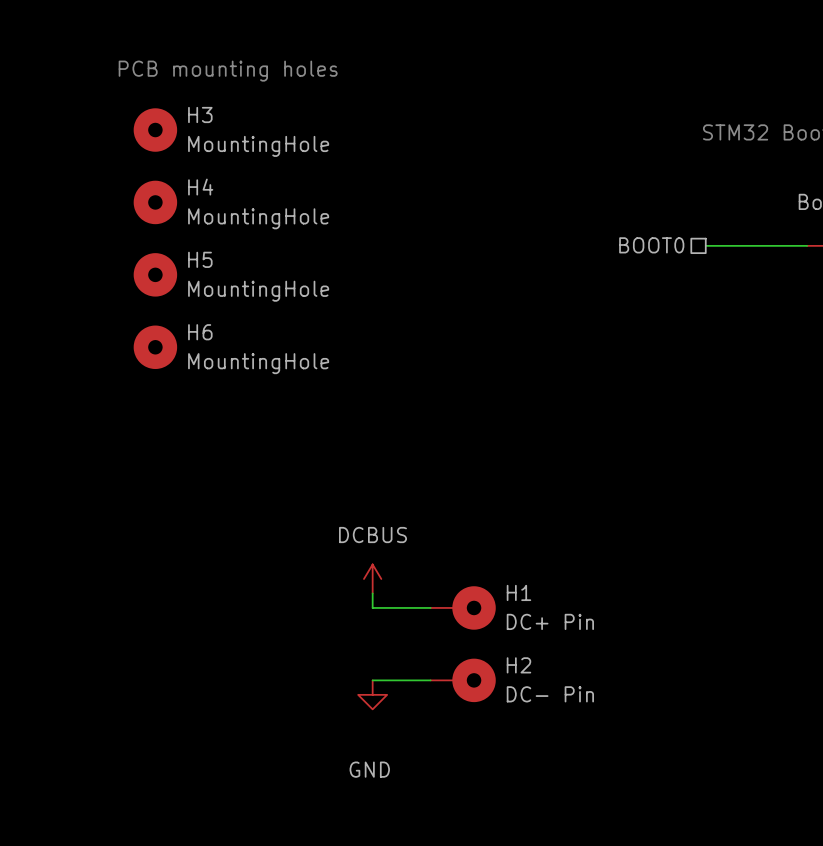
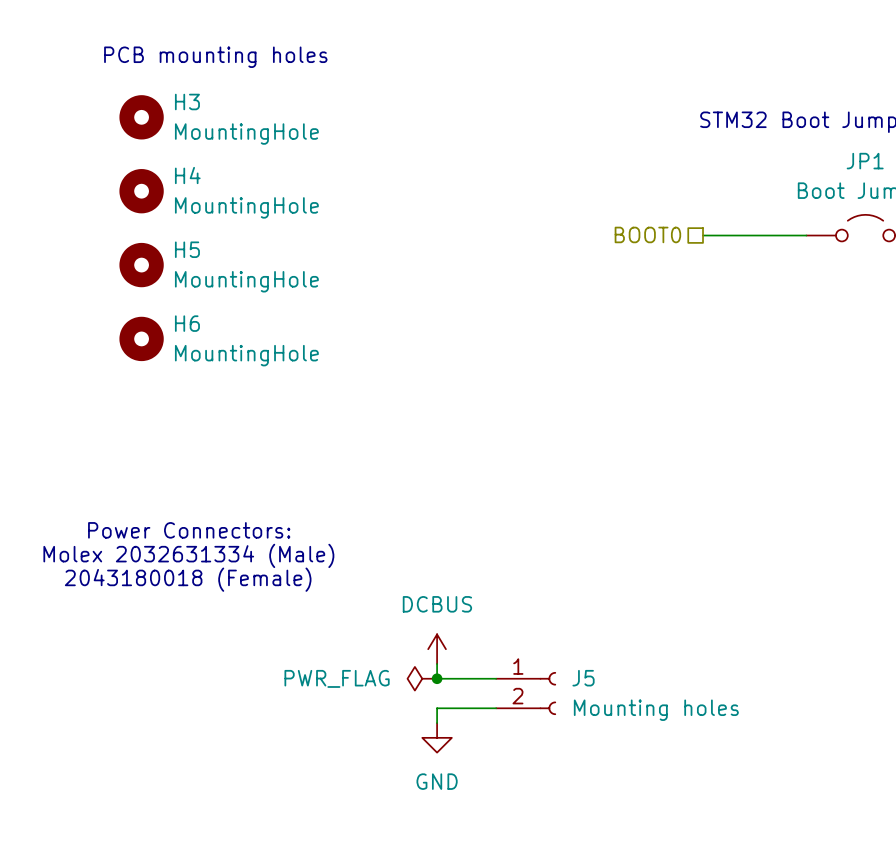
text: none -> Power Connectors: (189, 530)
text: none -> Molex 2032631334 (Male) (188, 555)
power symbol position: DCBUS (372, 579) -> DCBUS (437, 649)
text: none -> 2043180018 (Female) (188, 579)
wire: (372, 593) (372, 607) (430, 607) -> (437, 663) (437, 678) (496, 678)
H1: DC+ Pin (463, 607) -> none
wire: (372, 680) (430, 680) -> none
power symbol: none -> PWR_FLAG (422, 678)
junction: none -> (437, 678)
H2: DC- Pin (463, 680) -> none
power symbol position: GND (372, 694) -> GND (437, 737)
J5: none -> Mounting holes (526, 693)
wire: none -> (496, 708) (437, 708) (437, 723)
power symbol text position: GND (369, 769) -> GND (437, 781)

